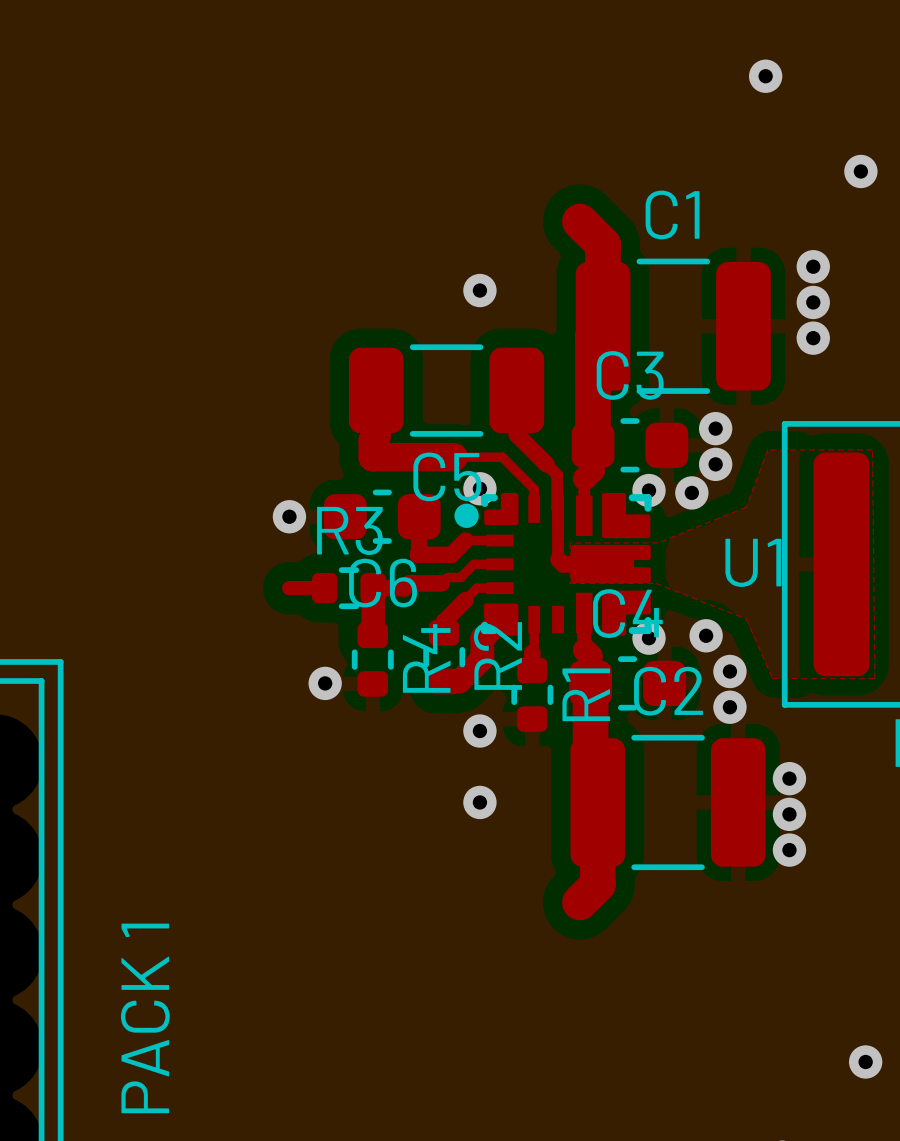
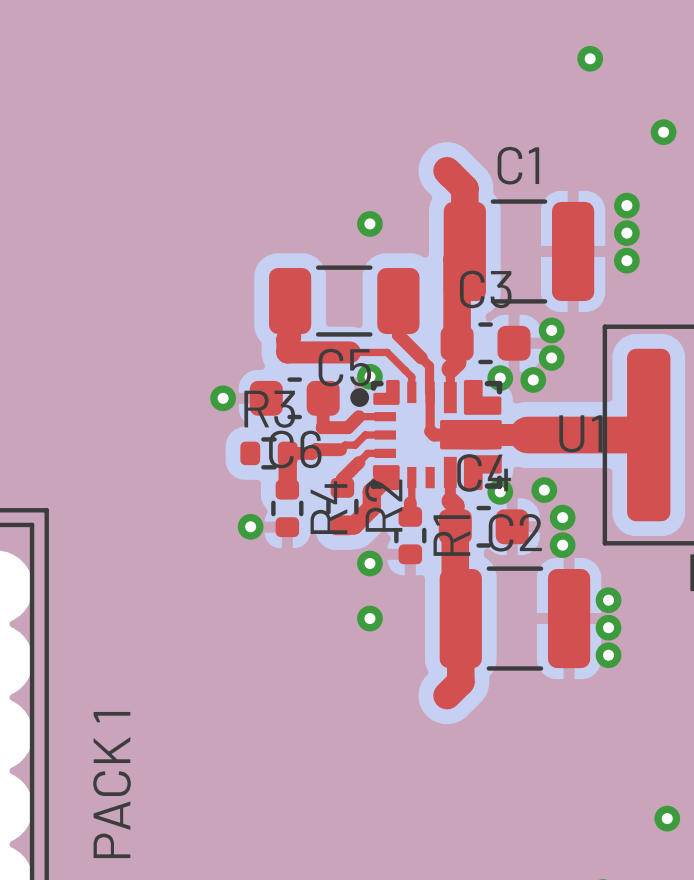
top zone outline: (767, 450) (746, 507) (658, 542) (570, 542) (570, 583) (655, 583) (746, 619) (772, 678) (874, 678) (872, 450) (767, 450) -> none
top track: none -> (470, 435) (648, 435)
top track: (289, 588) (324, 588) -> none

